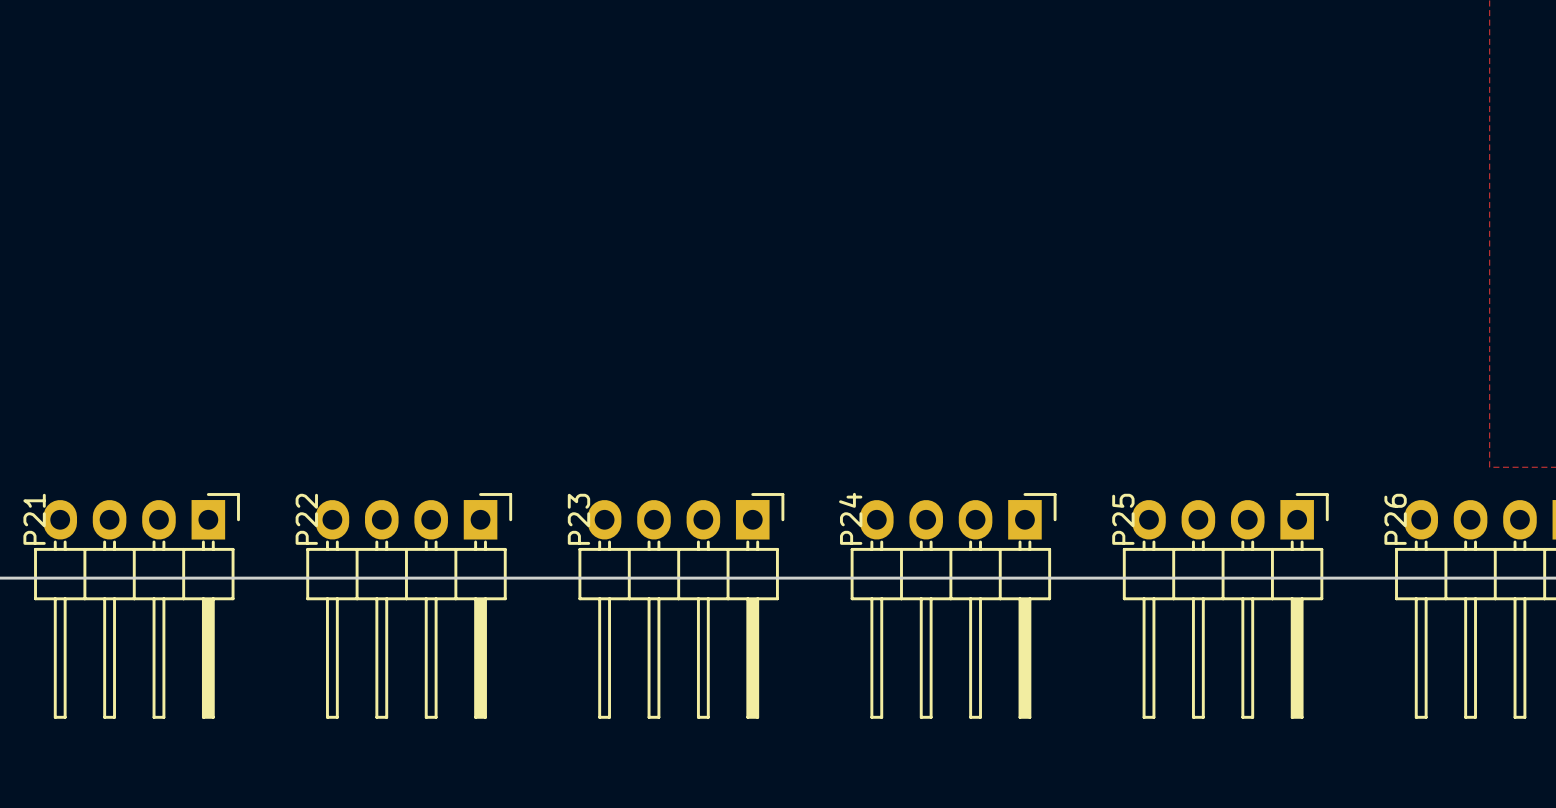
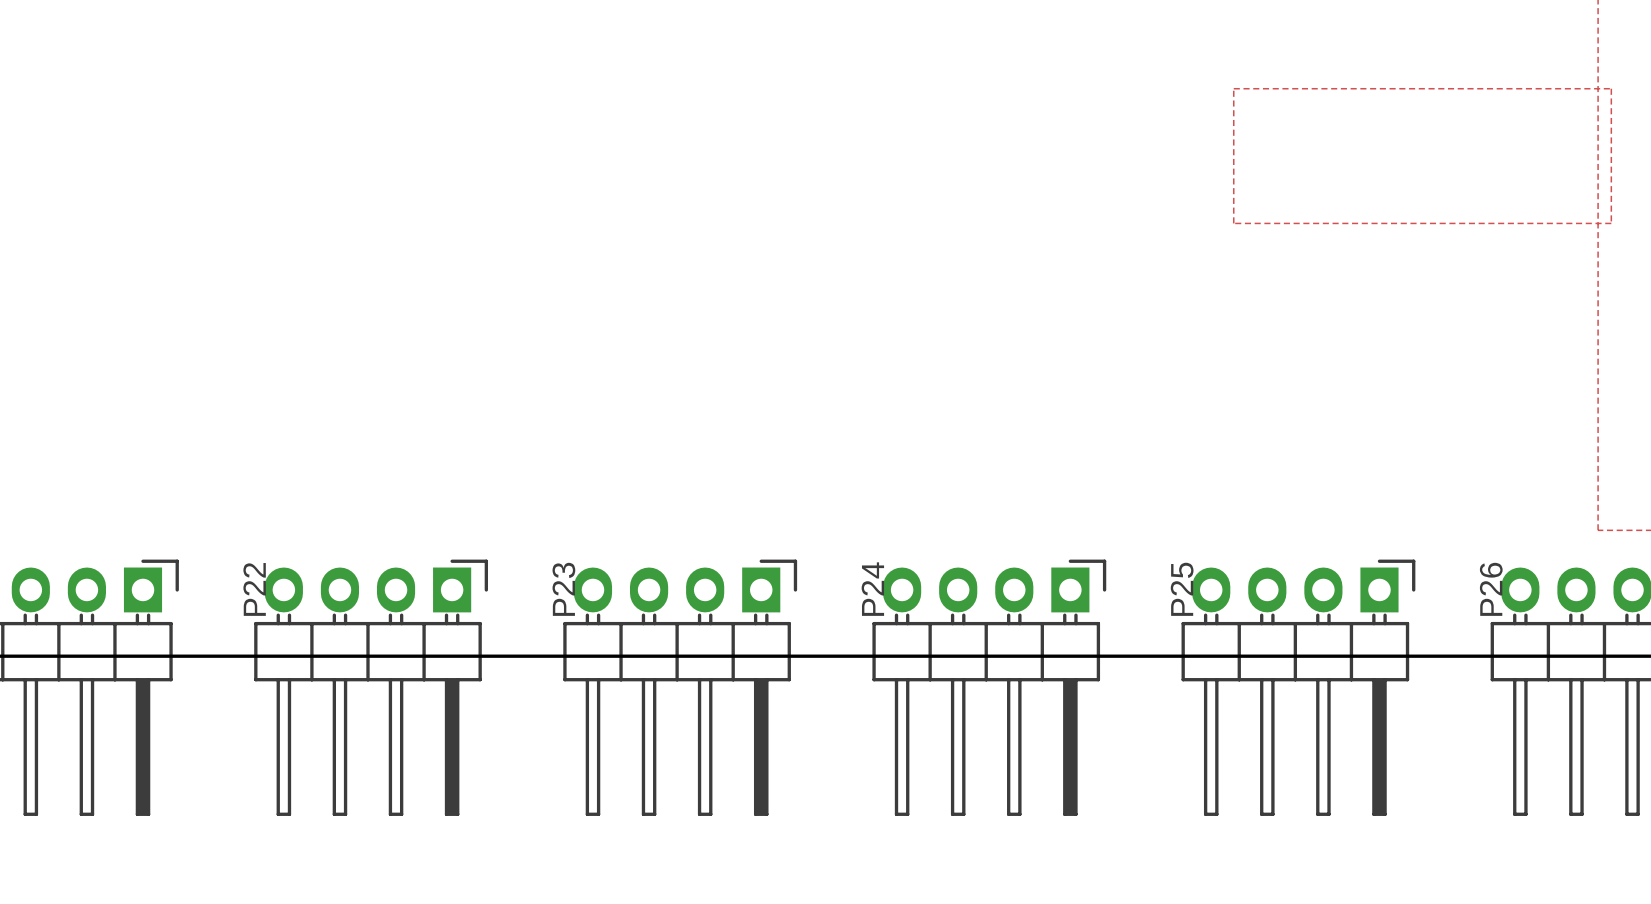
zone outline: none -> (1233, 88) (1233, 223) (1611, 223) (1611, 88) (1233, 88)

